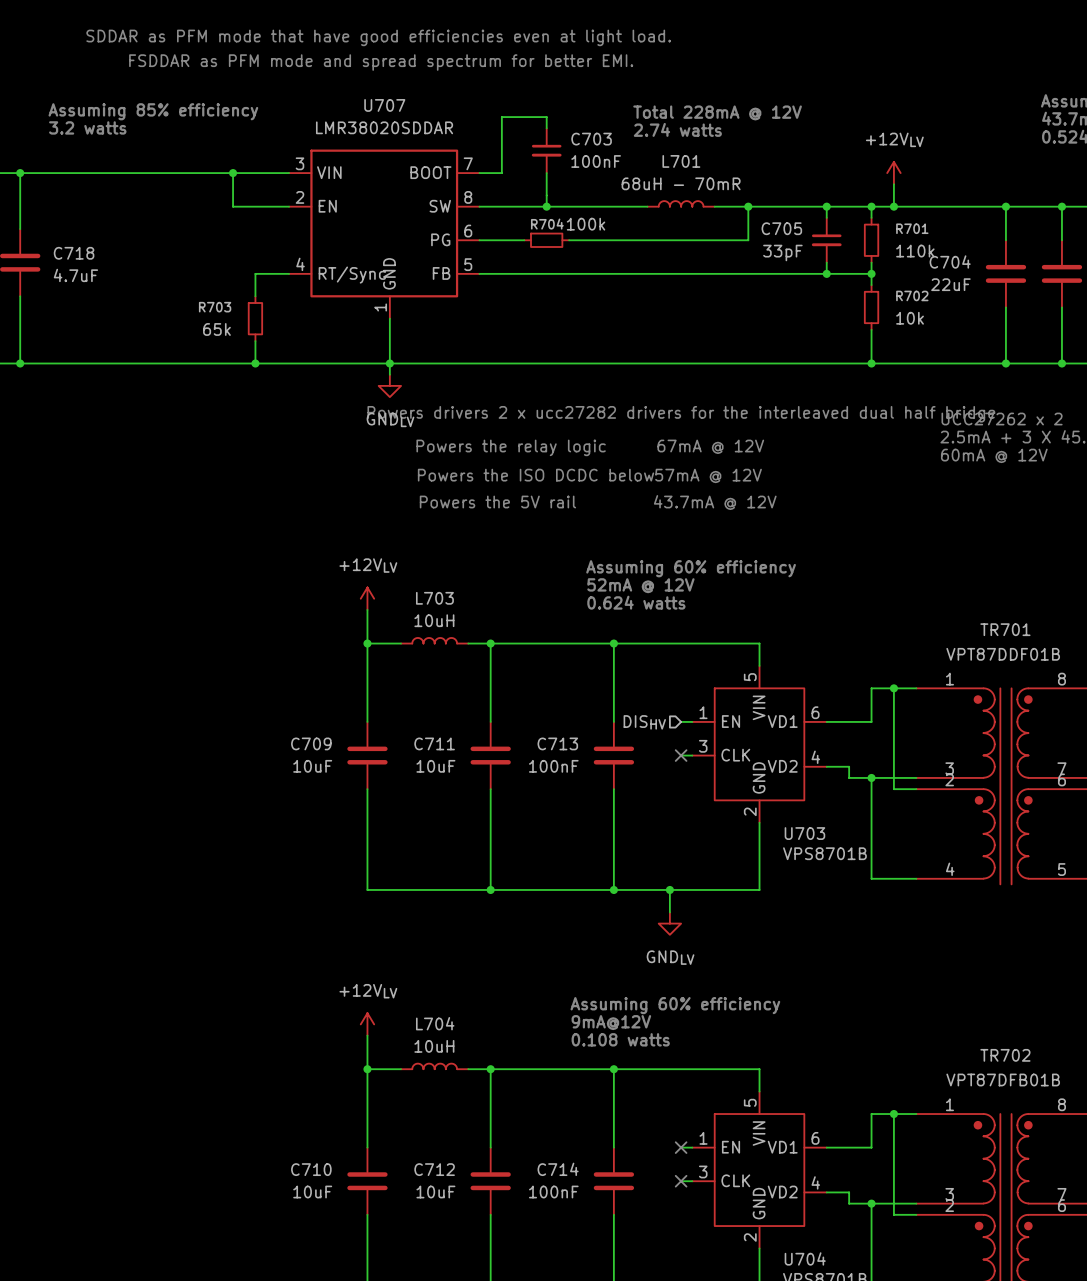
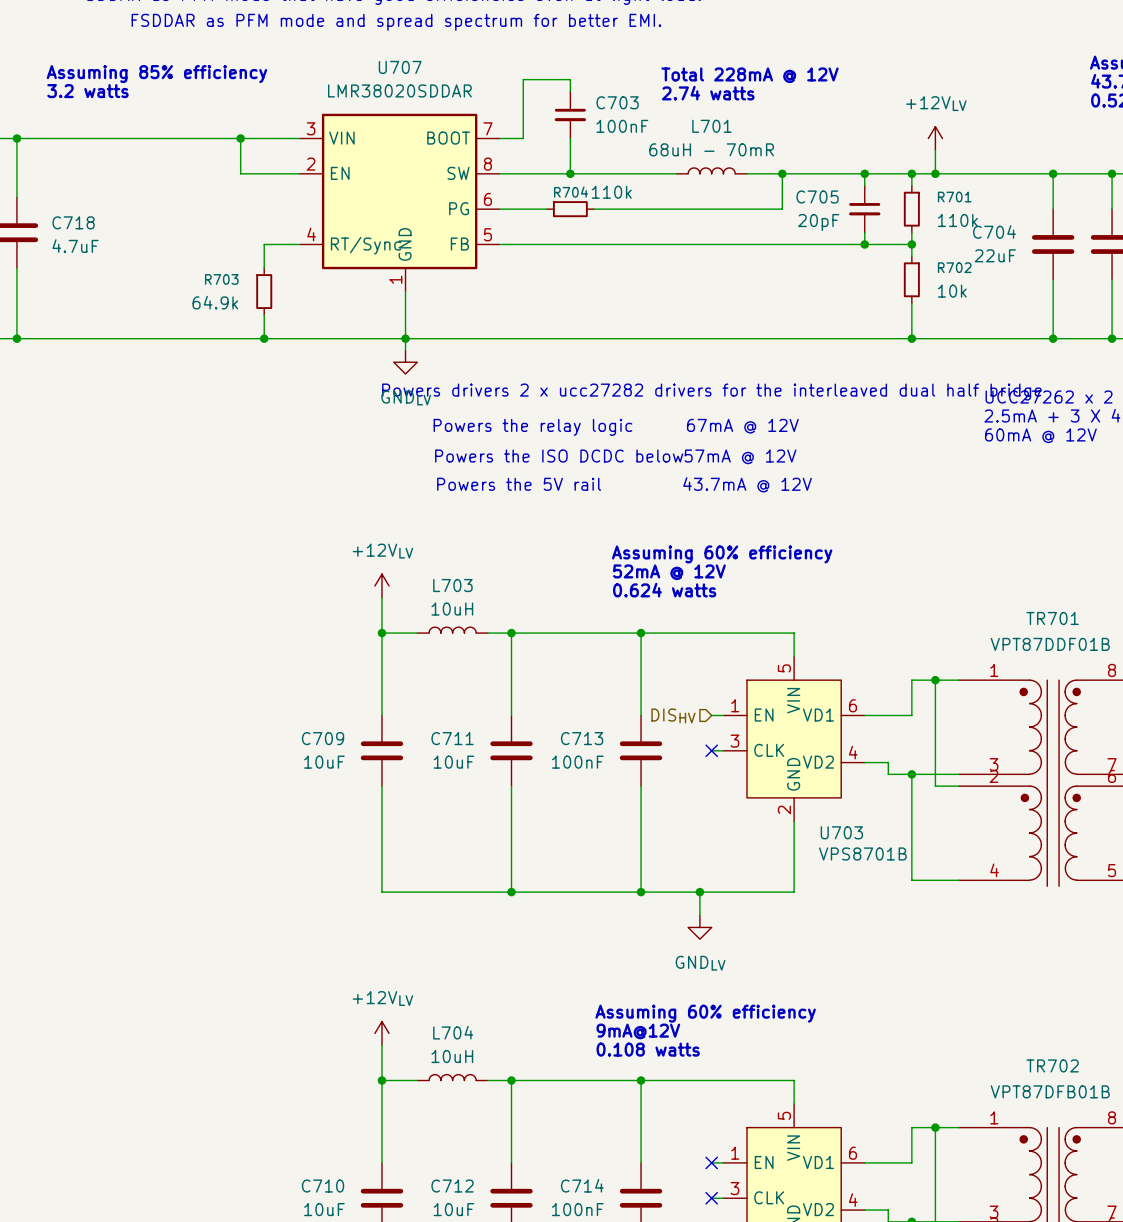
R704 value: 100k (586, 224) -> 110k (611, 192)
C705 value: 33pF (782, 252) -> 20pF (818, 222)
R703 value: 65k (216, 329) -> 64.9k (215, 302)

